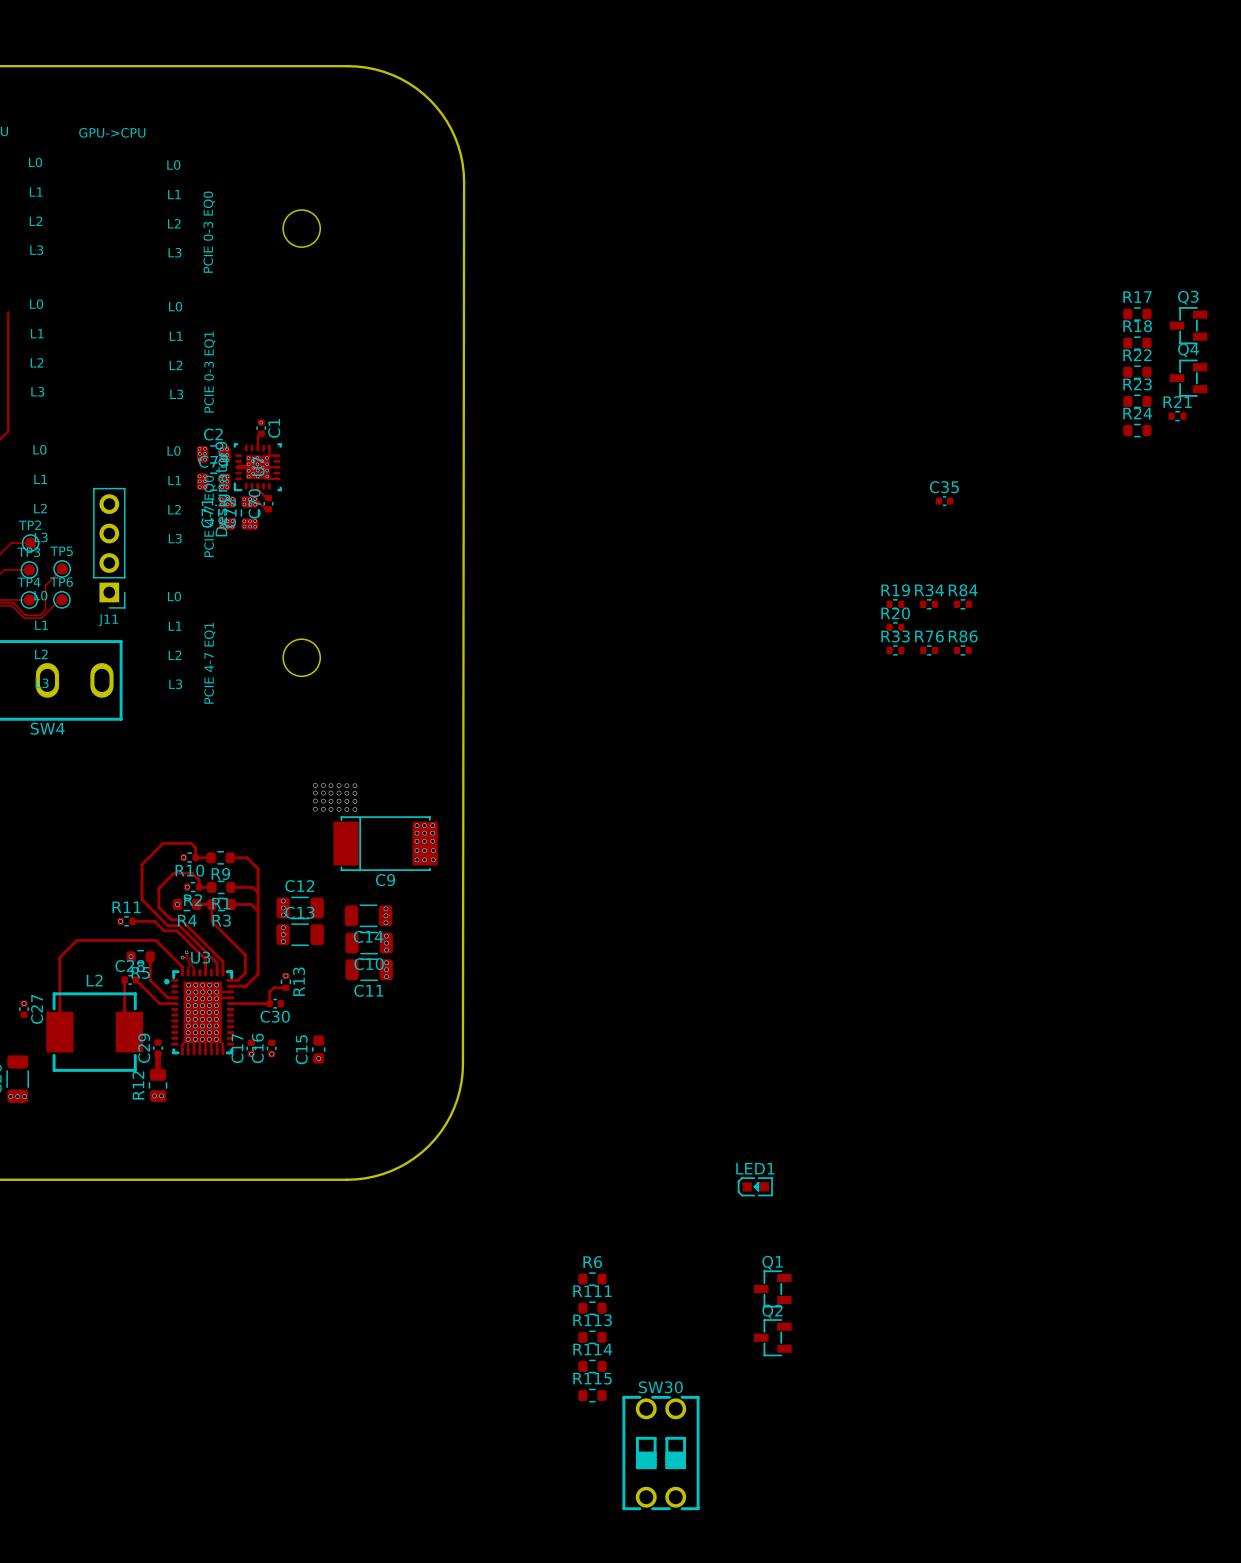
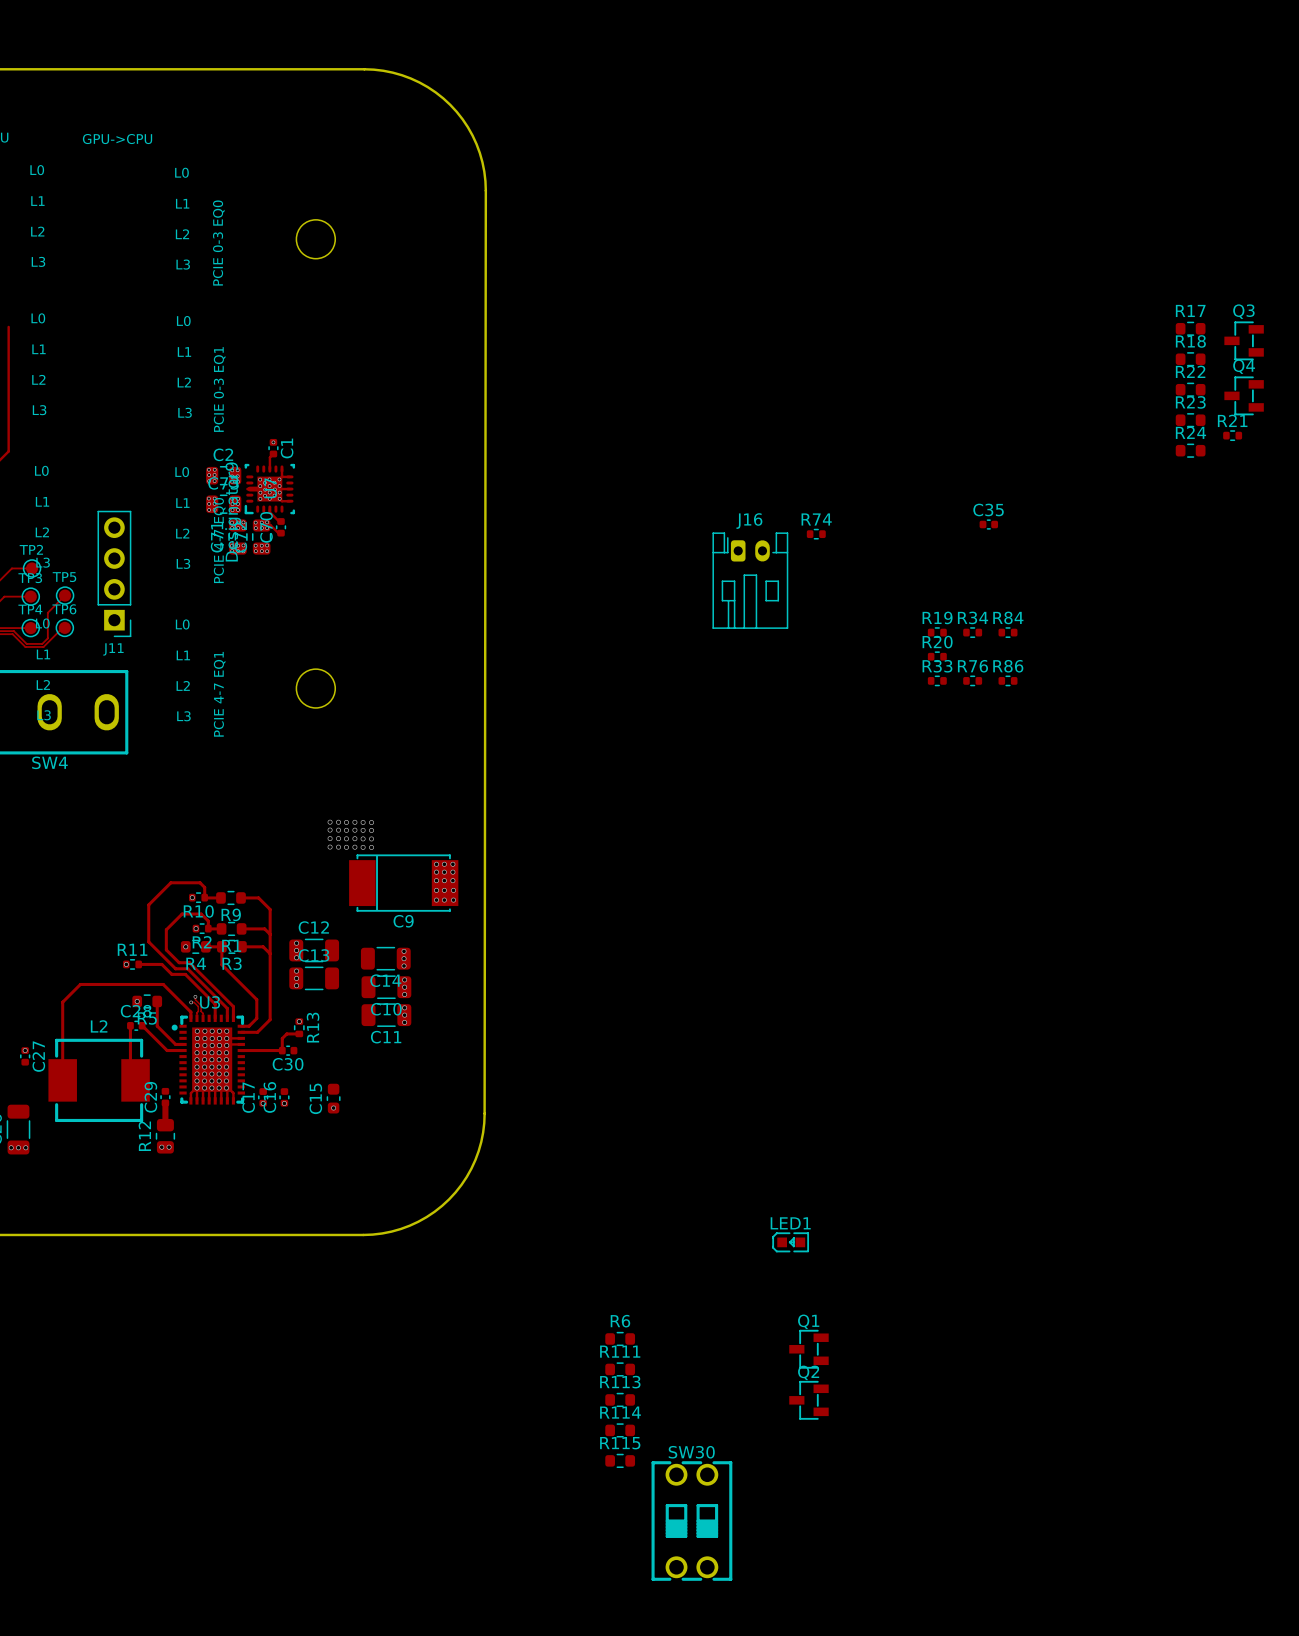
R74: none -> (816, 534)
J16: none -> (750, 580)

